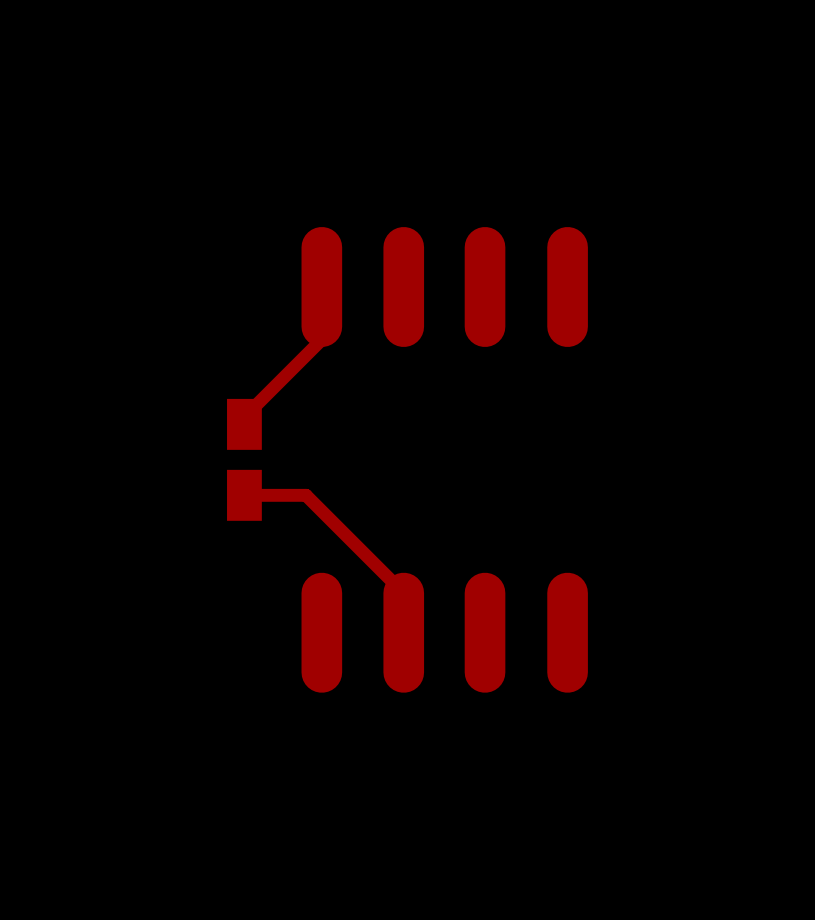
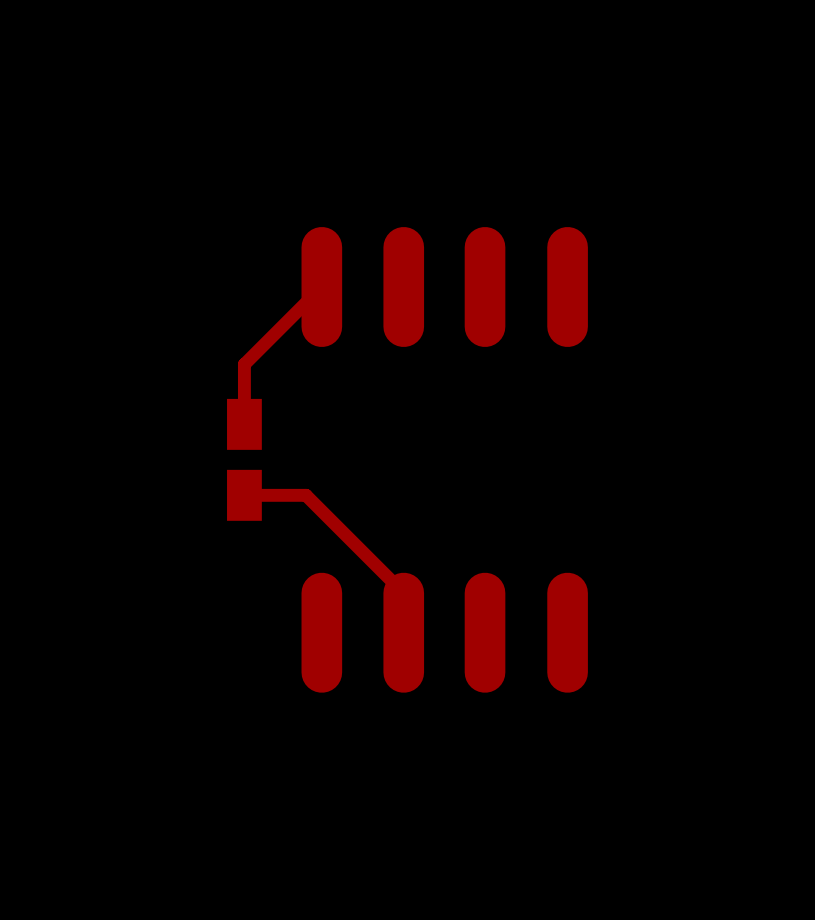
top track: (321, 287) (321, 339) (244, 417) -> (321, 287) (244, 364) (244, 417)

